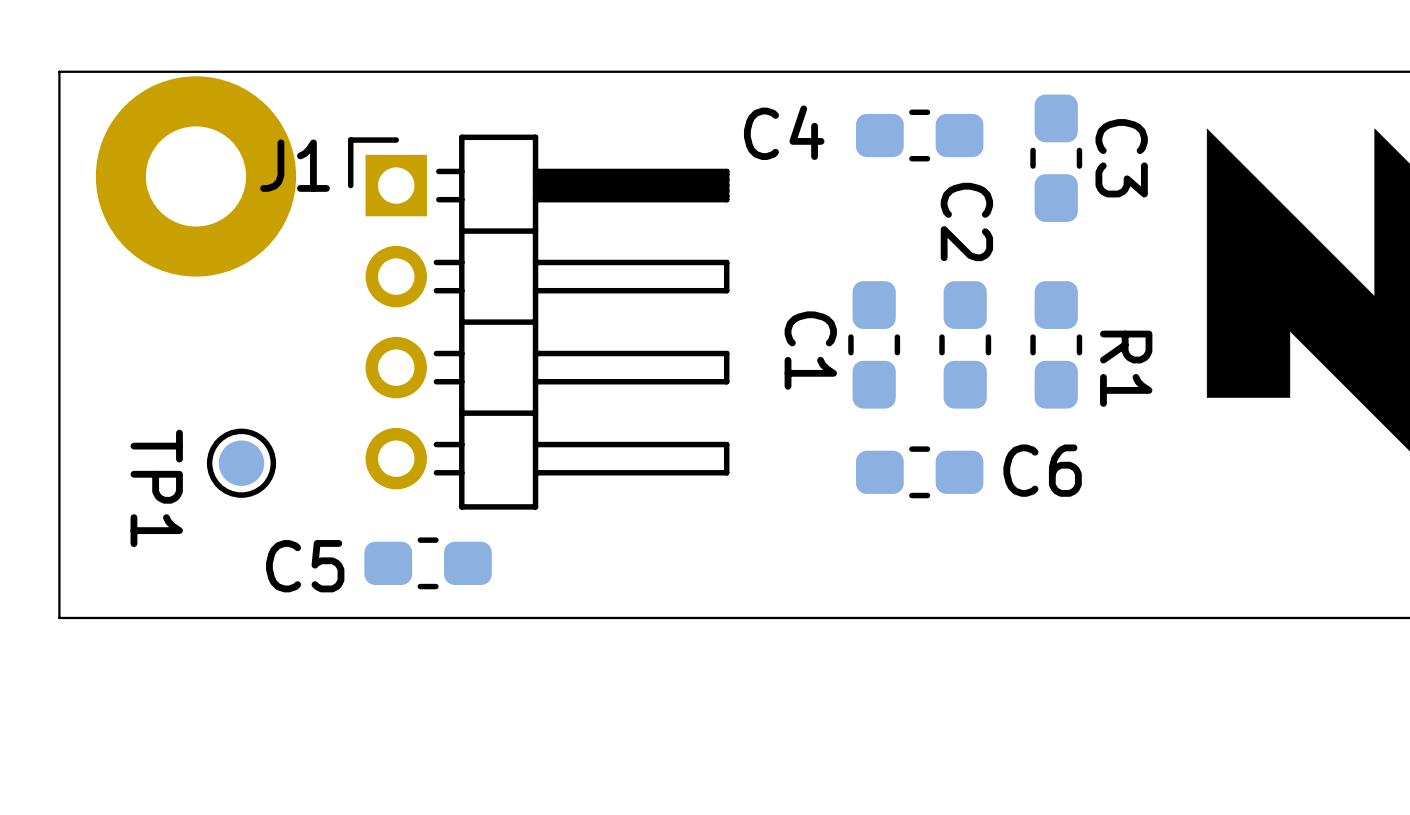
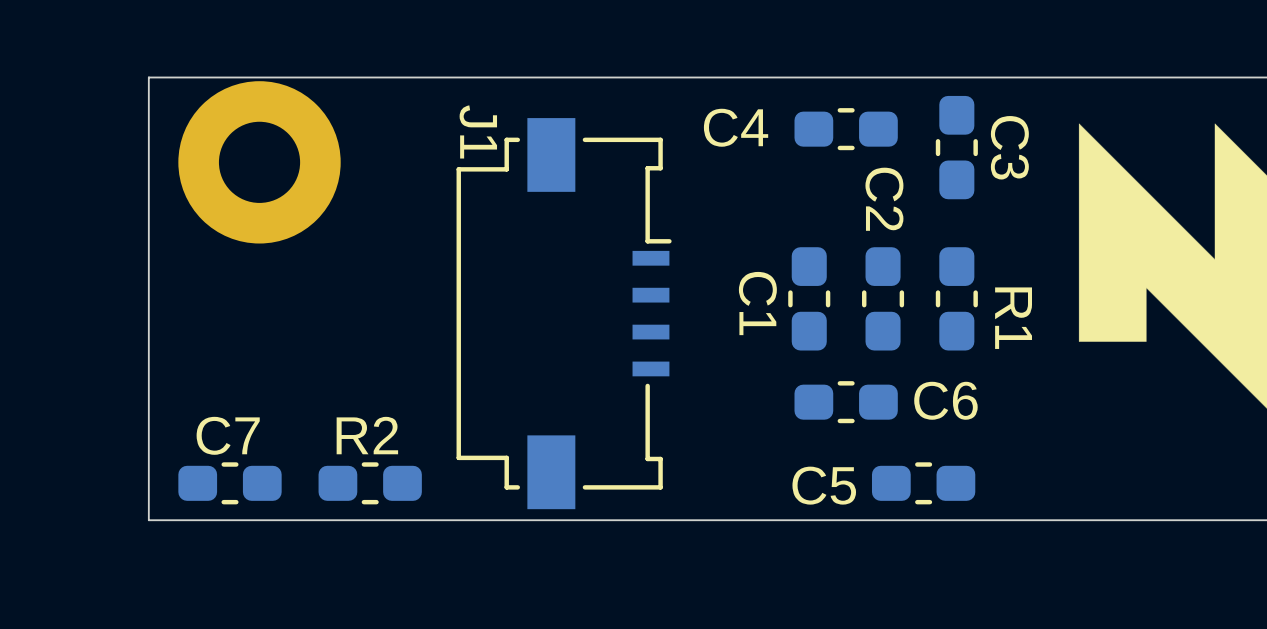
J1 footprint: [348, 134, 730, 510] -> [456, 118, 672, 510]
J1 name position: J1 (295, 165) -> J1 (478, 131)
TP1: (241, 463) -> none
C5 position: (428, 563) -> (923, 483)
C7: none -> (230, 483)
R2: none -> (370, 483)

